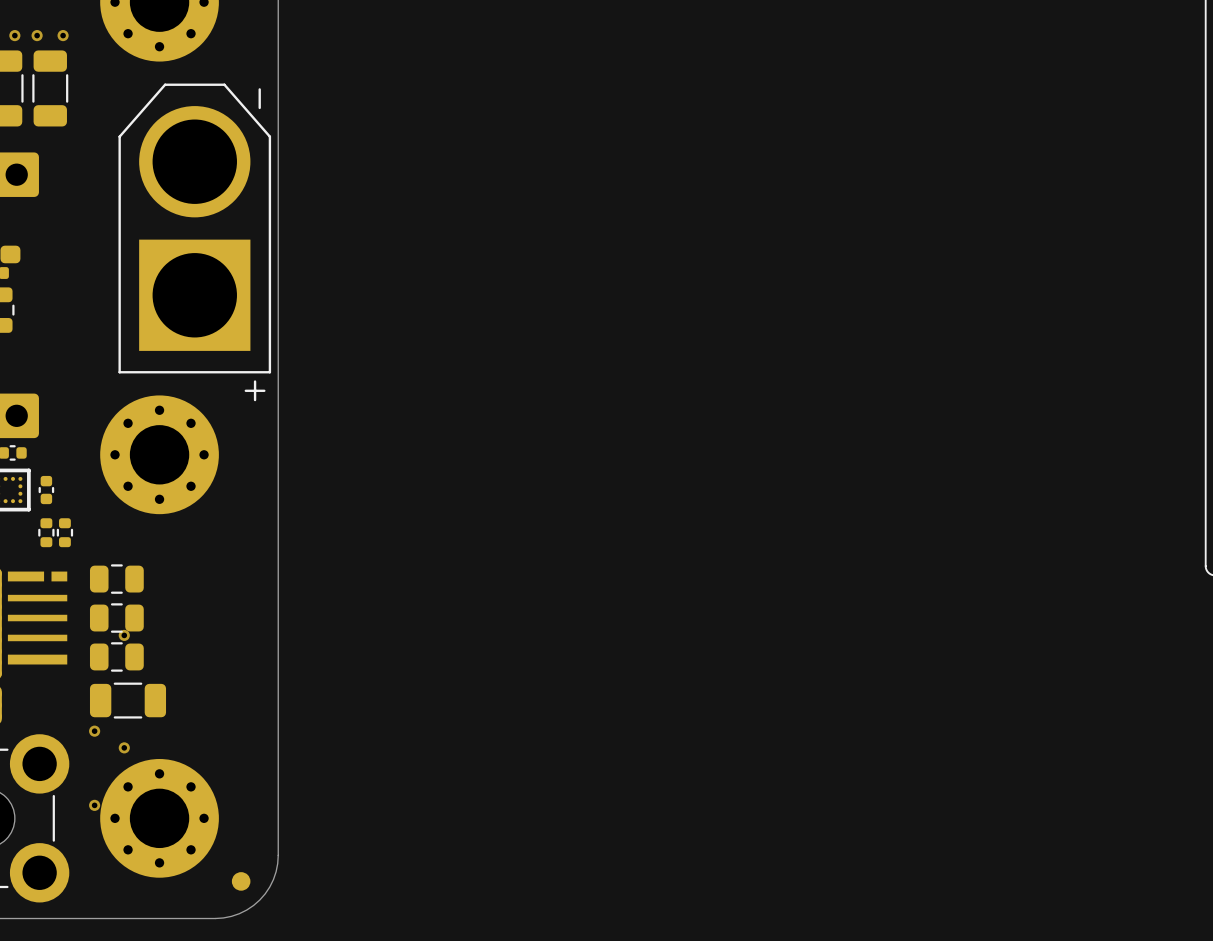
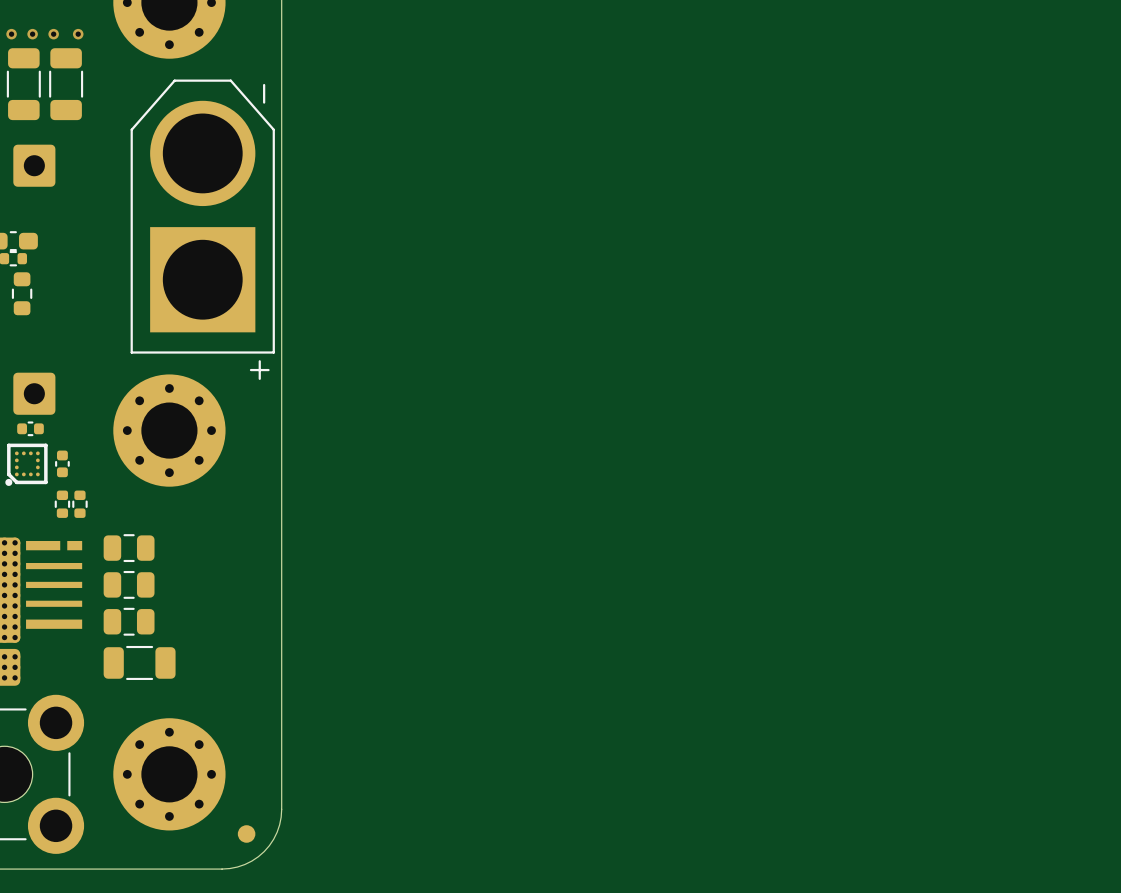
via: (124, 635) -> none
via: (94, 731) -> none
via: (124, 747) -> none
via: (94, 805) -> none

